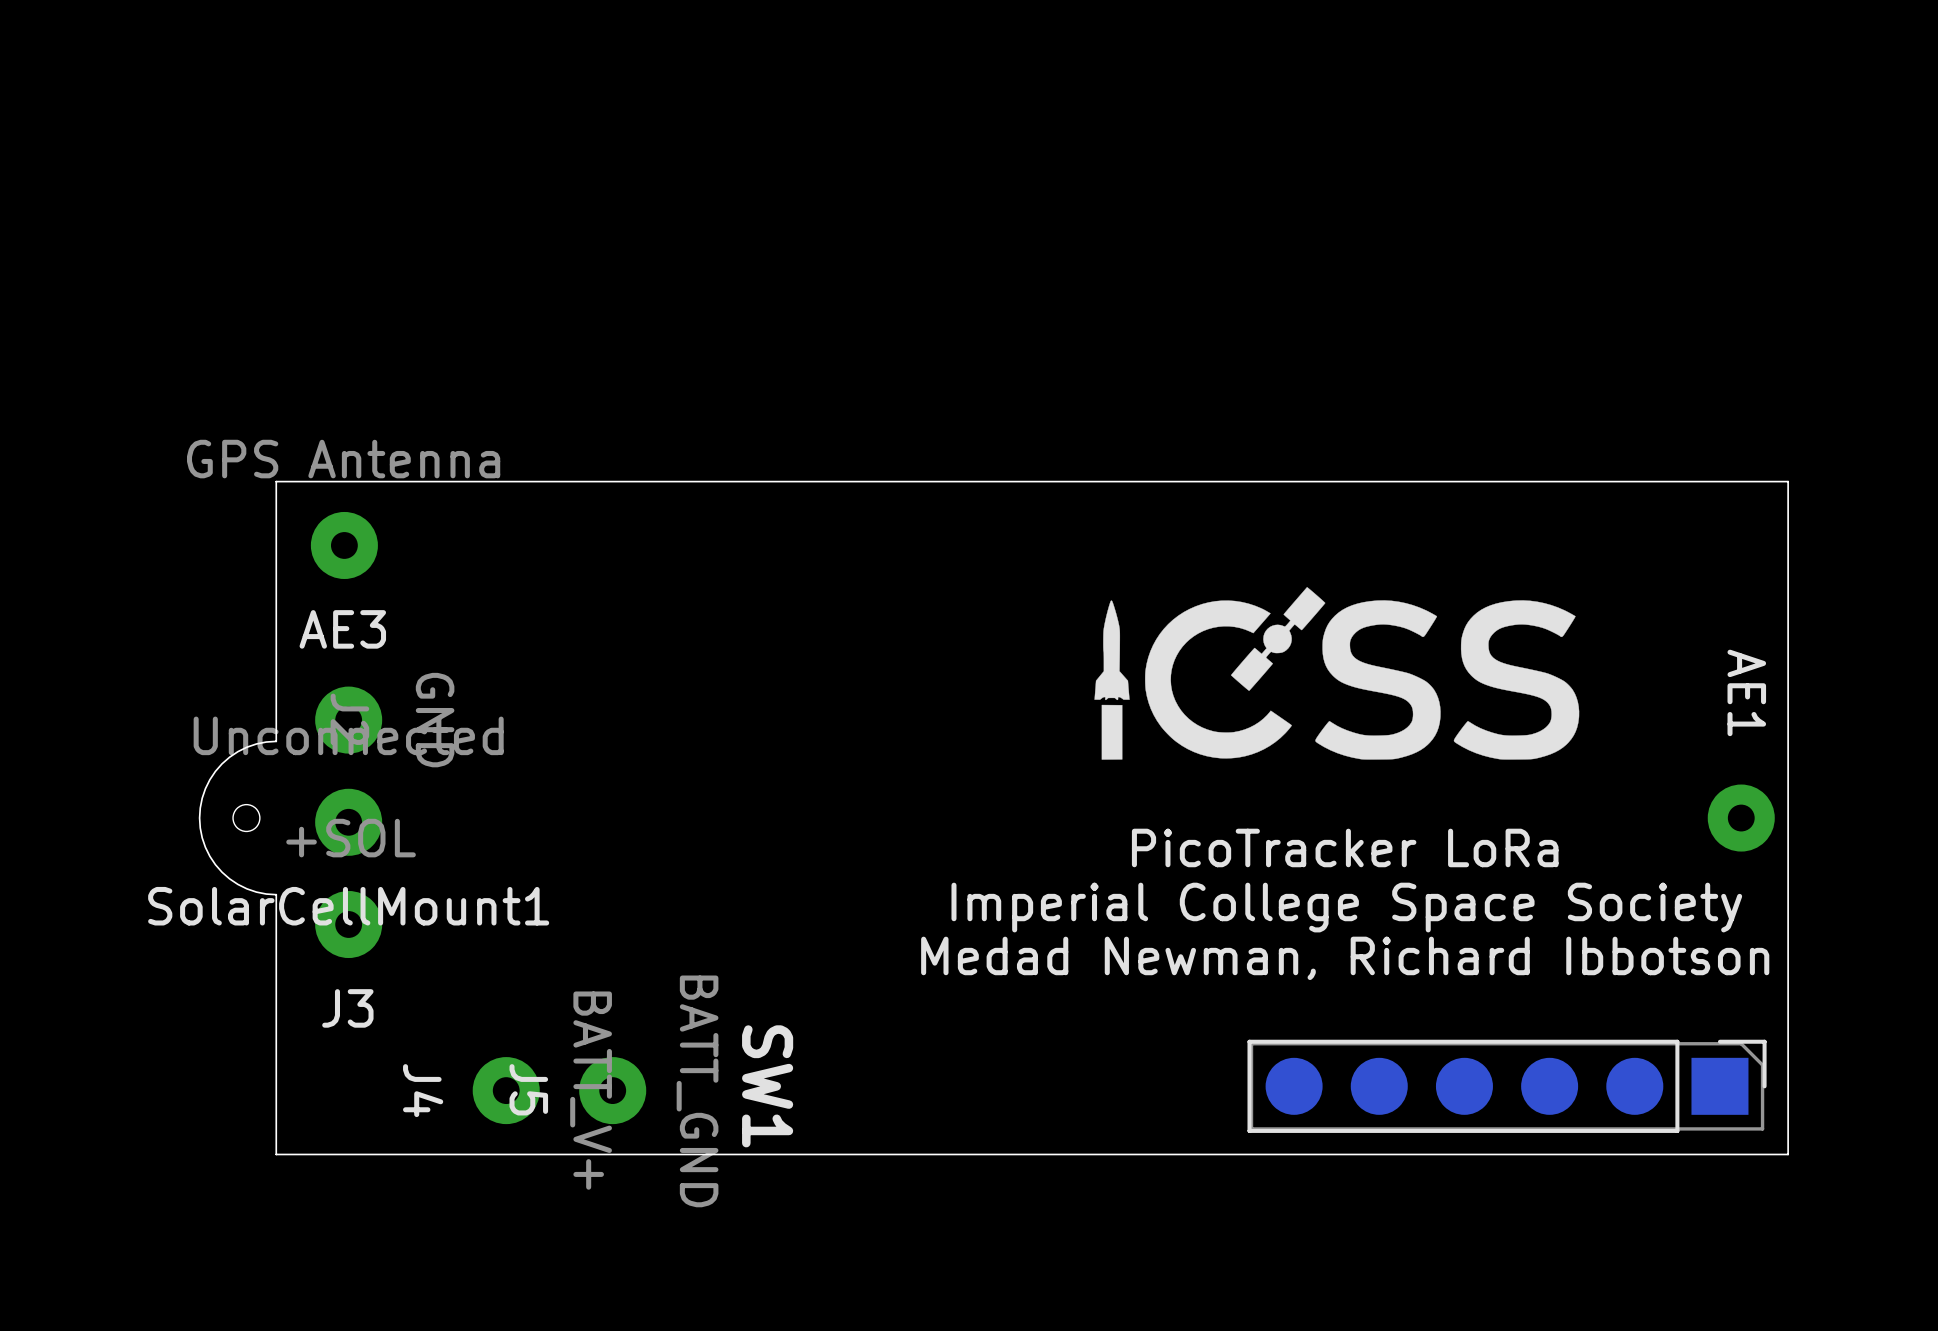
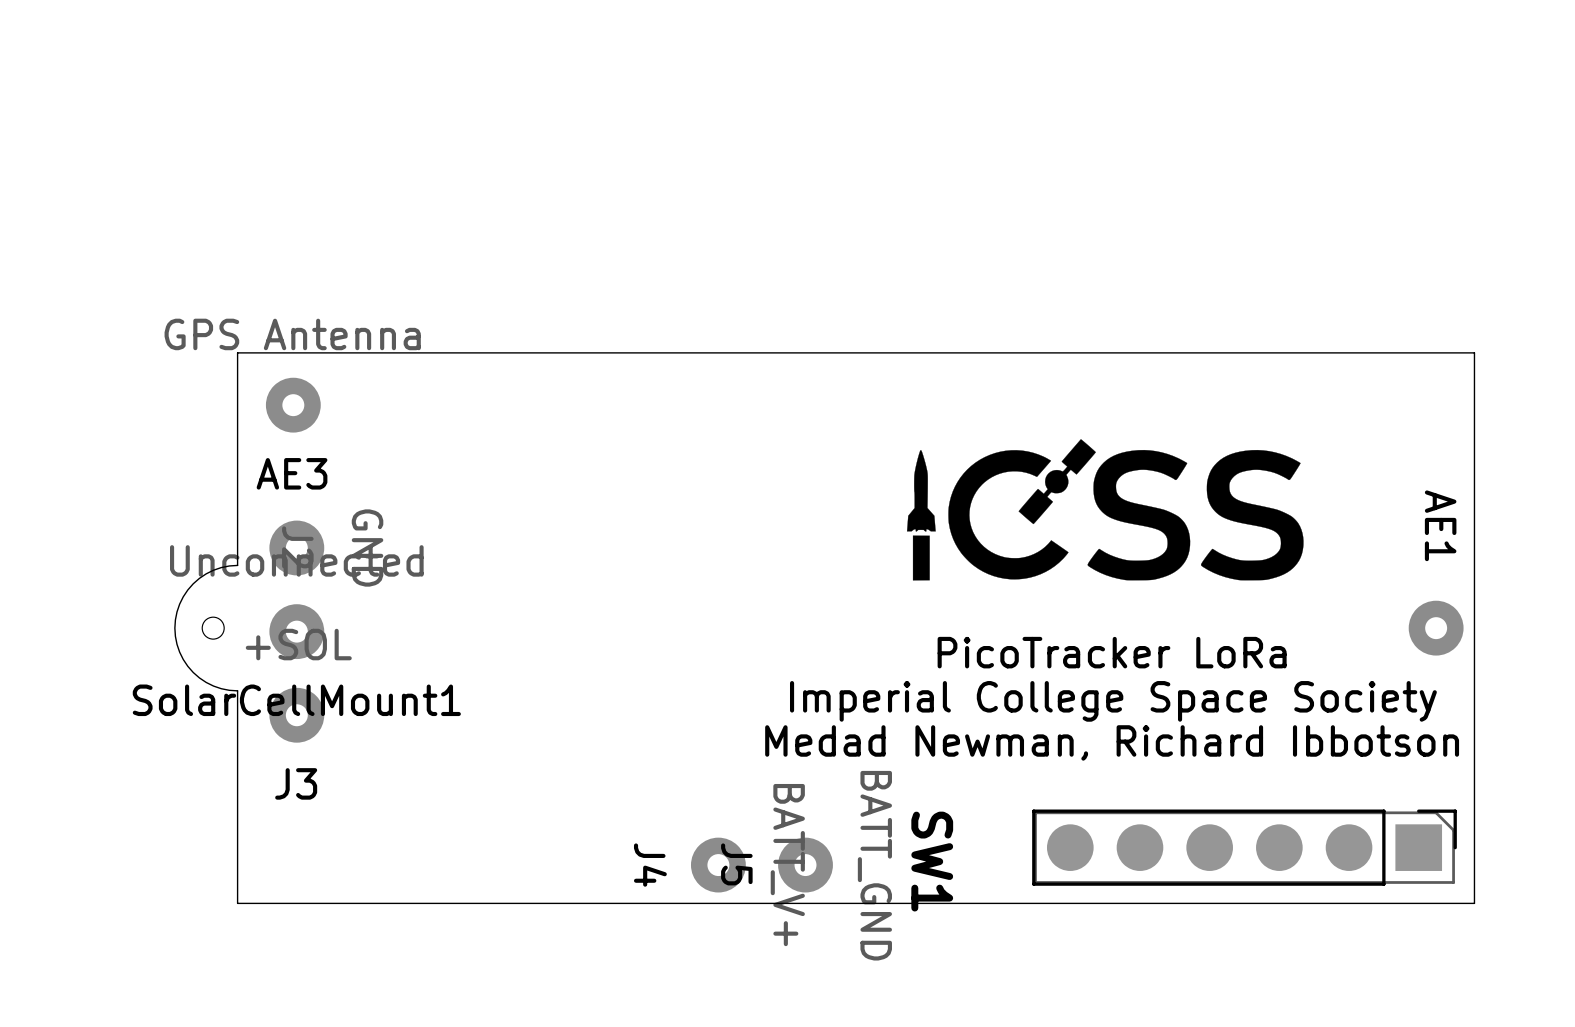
SW1 position: (767, 1086) -> (932, 861)
J4 position: (506, 1090) -> (718, 865)
J5 position: (612, 1090) -> (805, 865)

